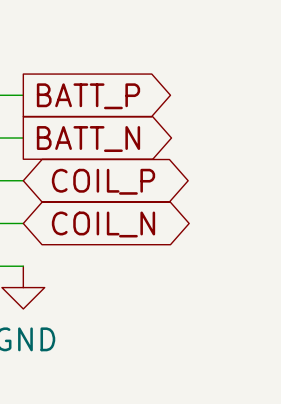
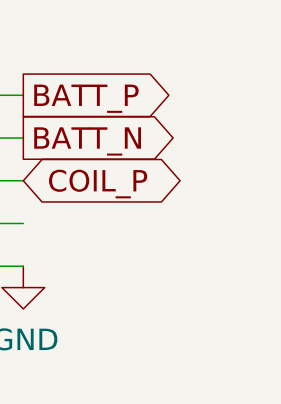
global label: COIL_N (103, 224) -> none

